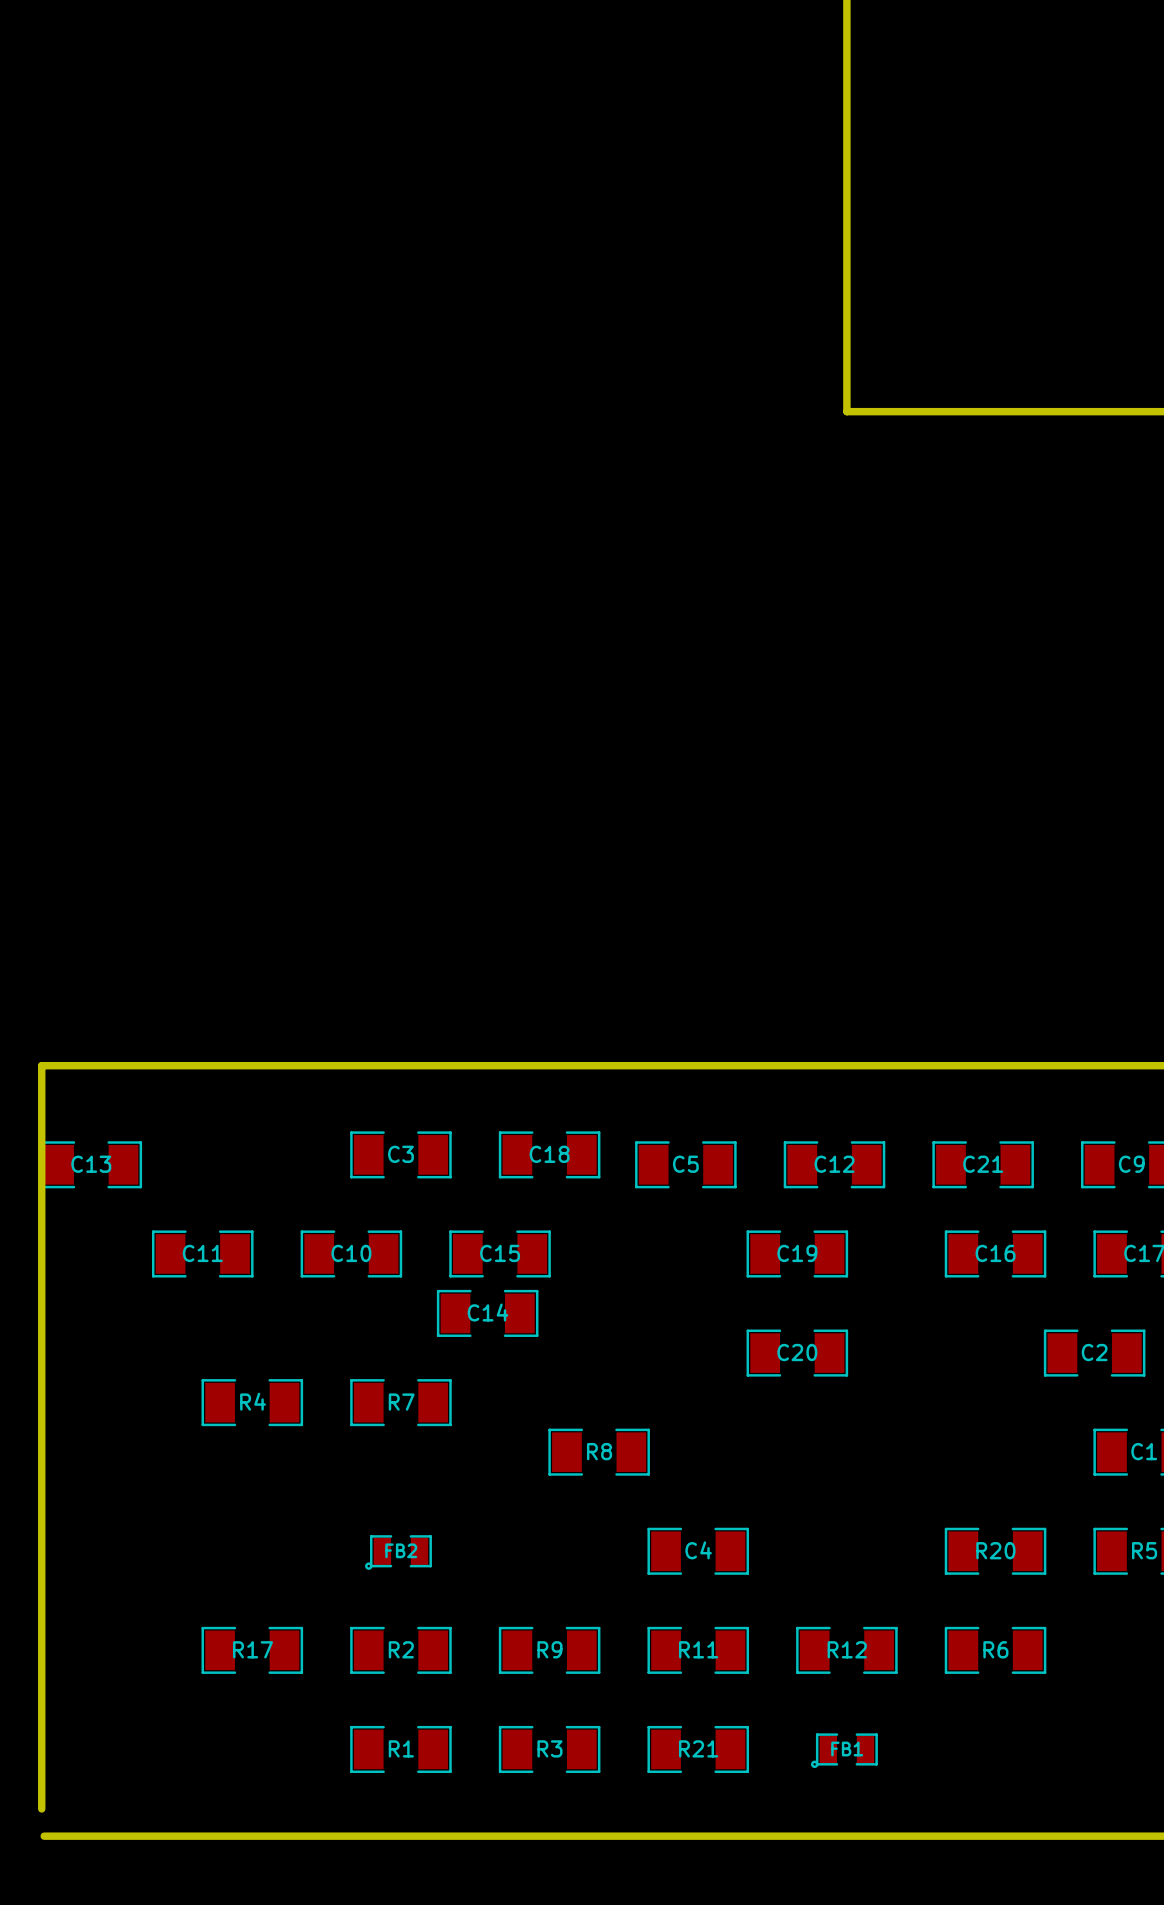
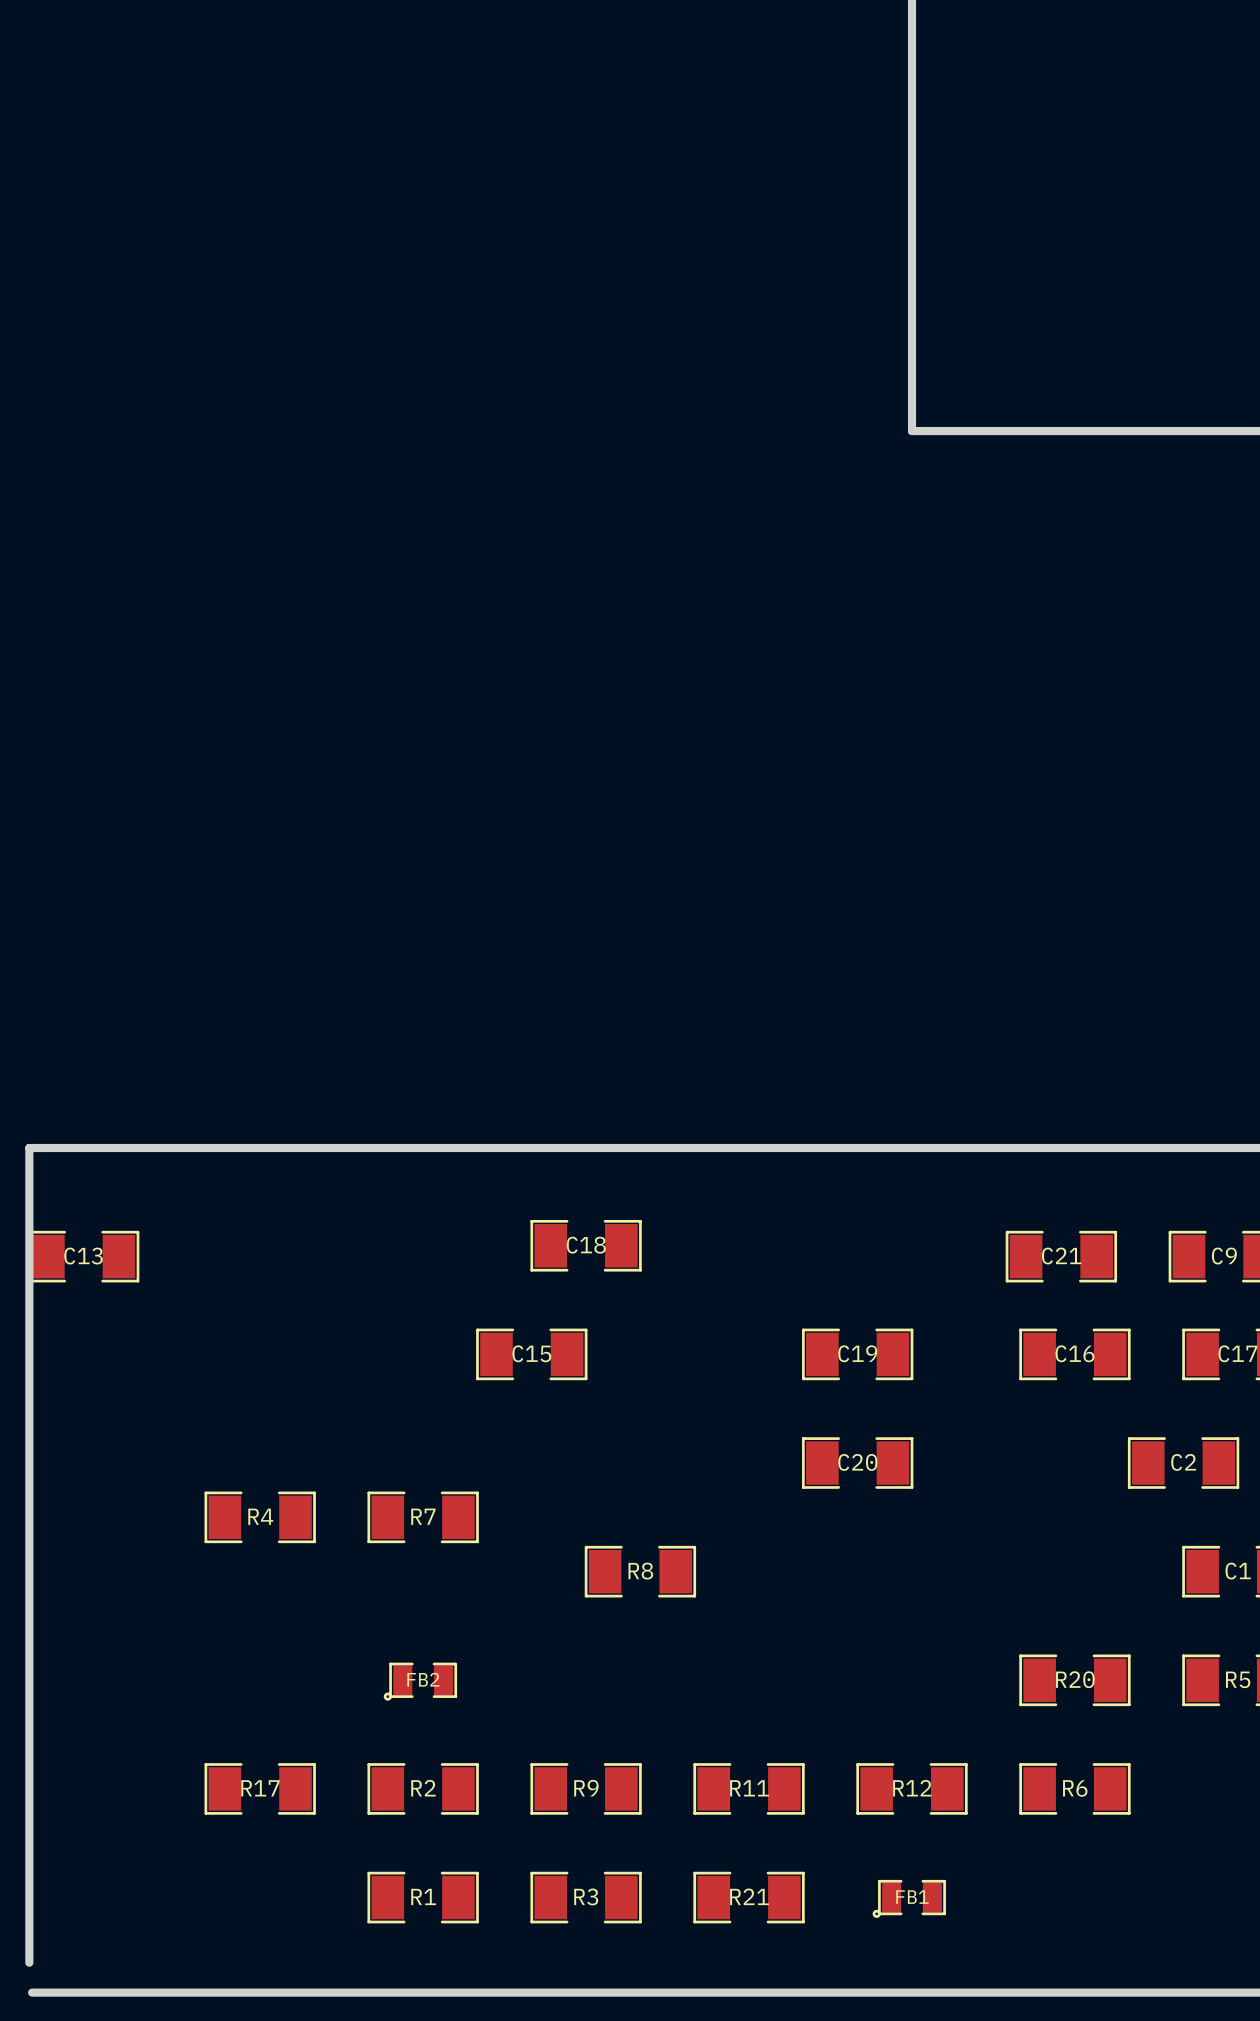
C3: (400, 1154) -> none
C5: (685, 1164) -> none
C12: (834, 1164) -> none
C11: (202, 1253) -> none
C10: (351, 1253) -> none
C14: (487, 1313) -> none
C4: (698, 1551) -> none

